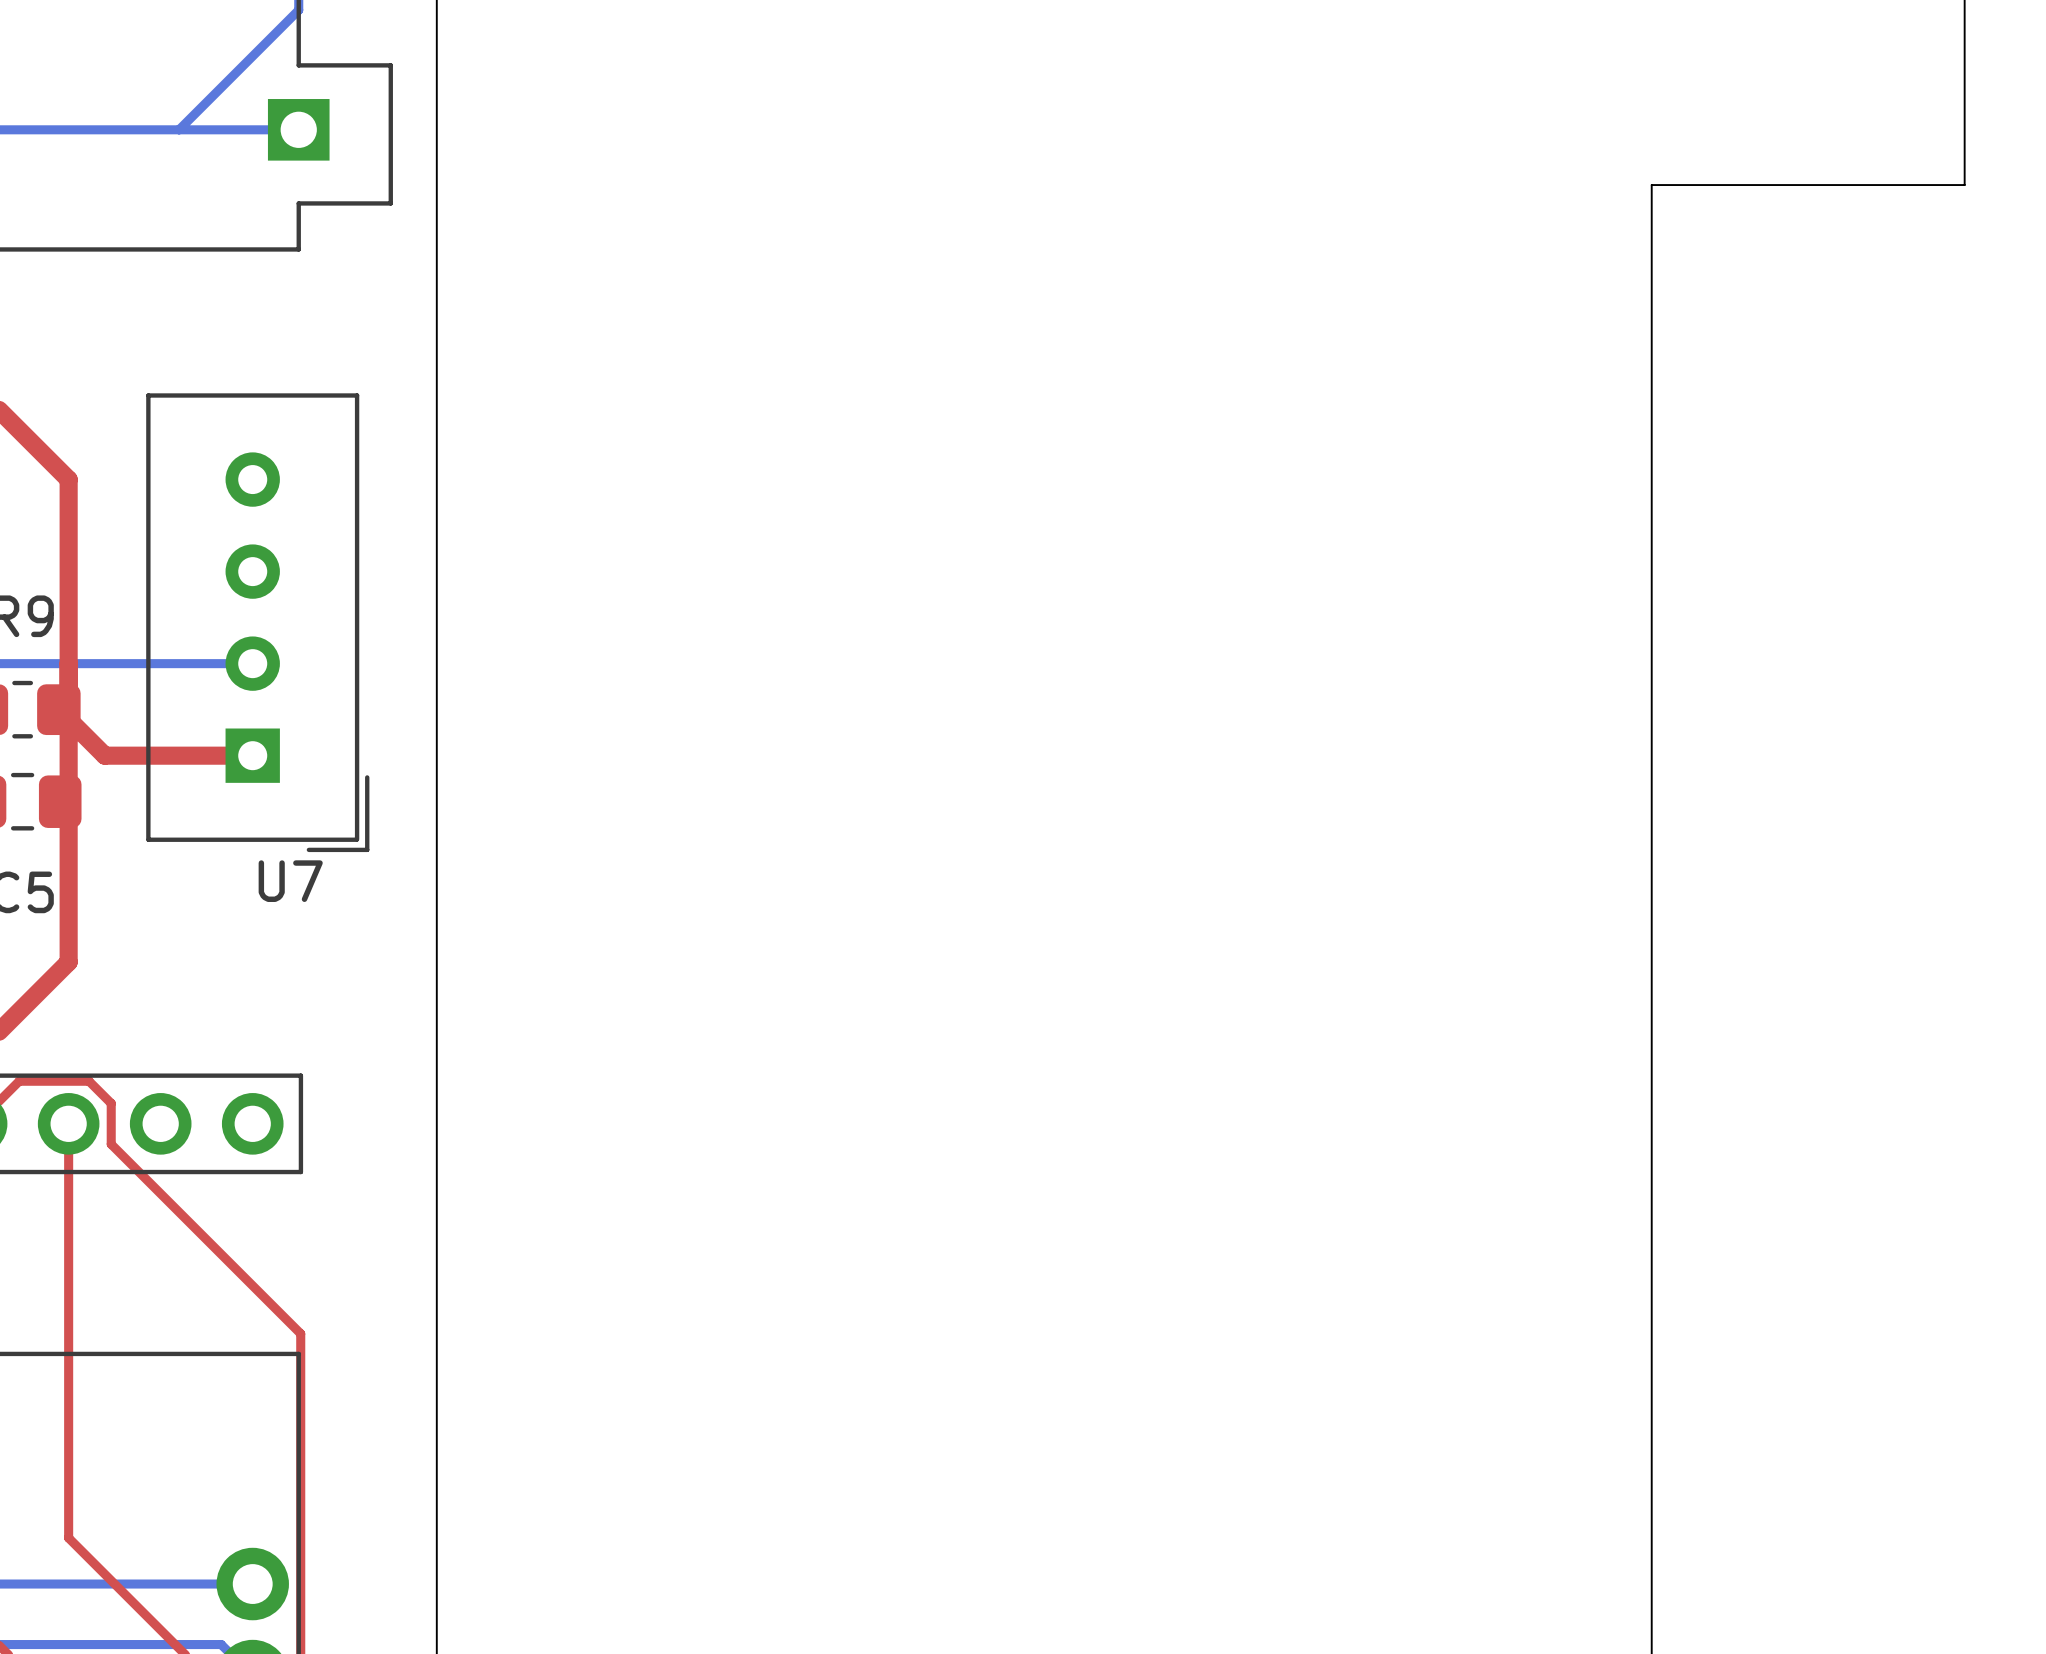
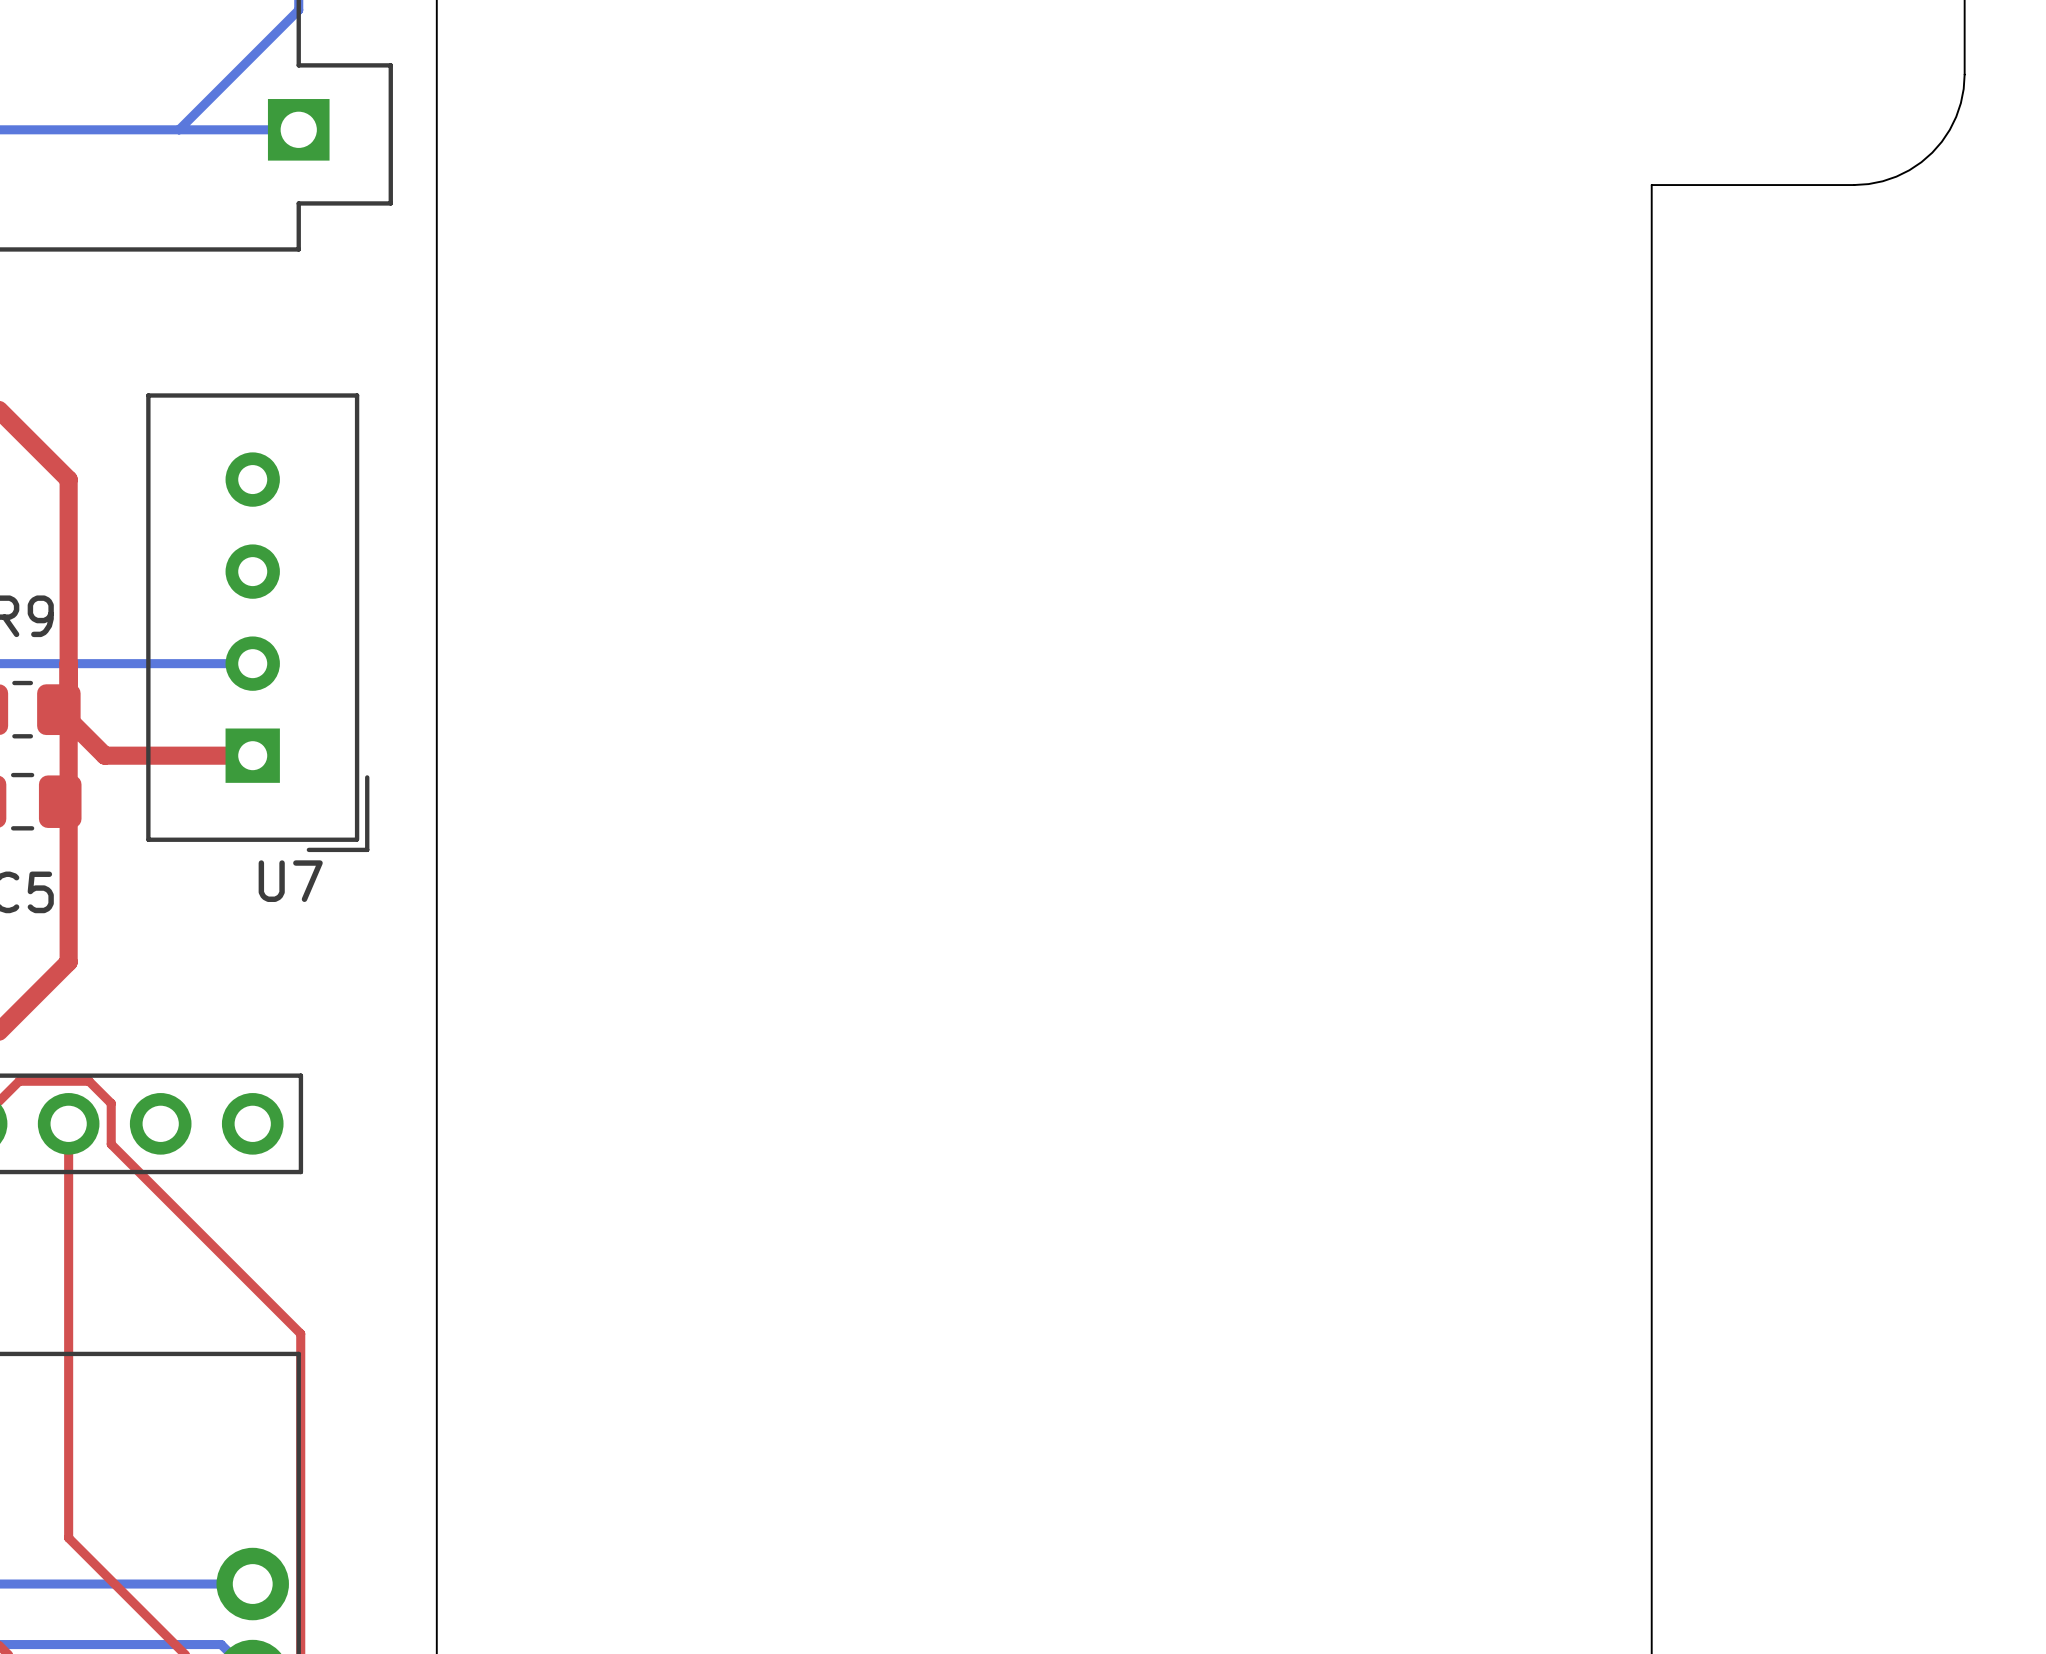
board edge: (1964, 74) (1964, 185) (1854, 185) -> (1964, 74) (1960, 103) (1956, 116) (1941, 141) (1932, 152) (1909, 170) (1896, 176) (1868, 184) (1854, 185)

